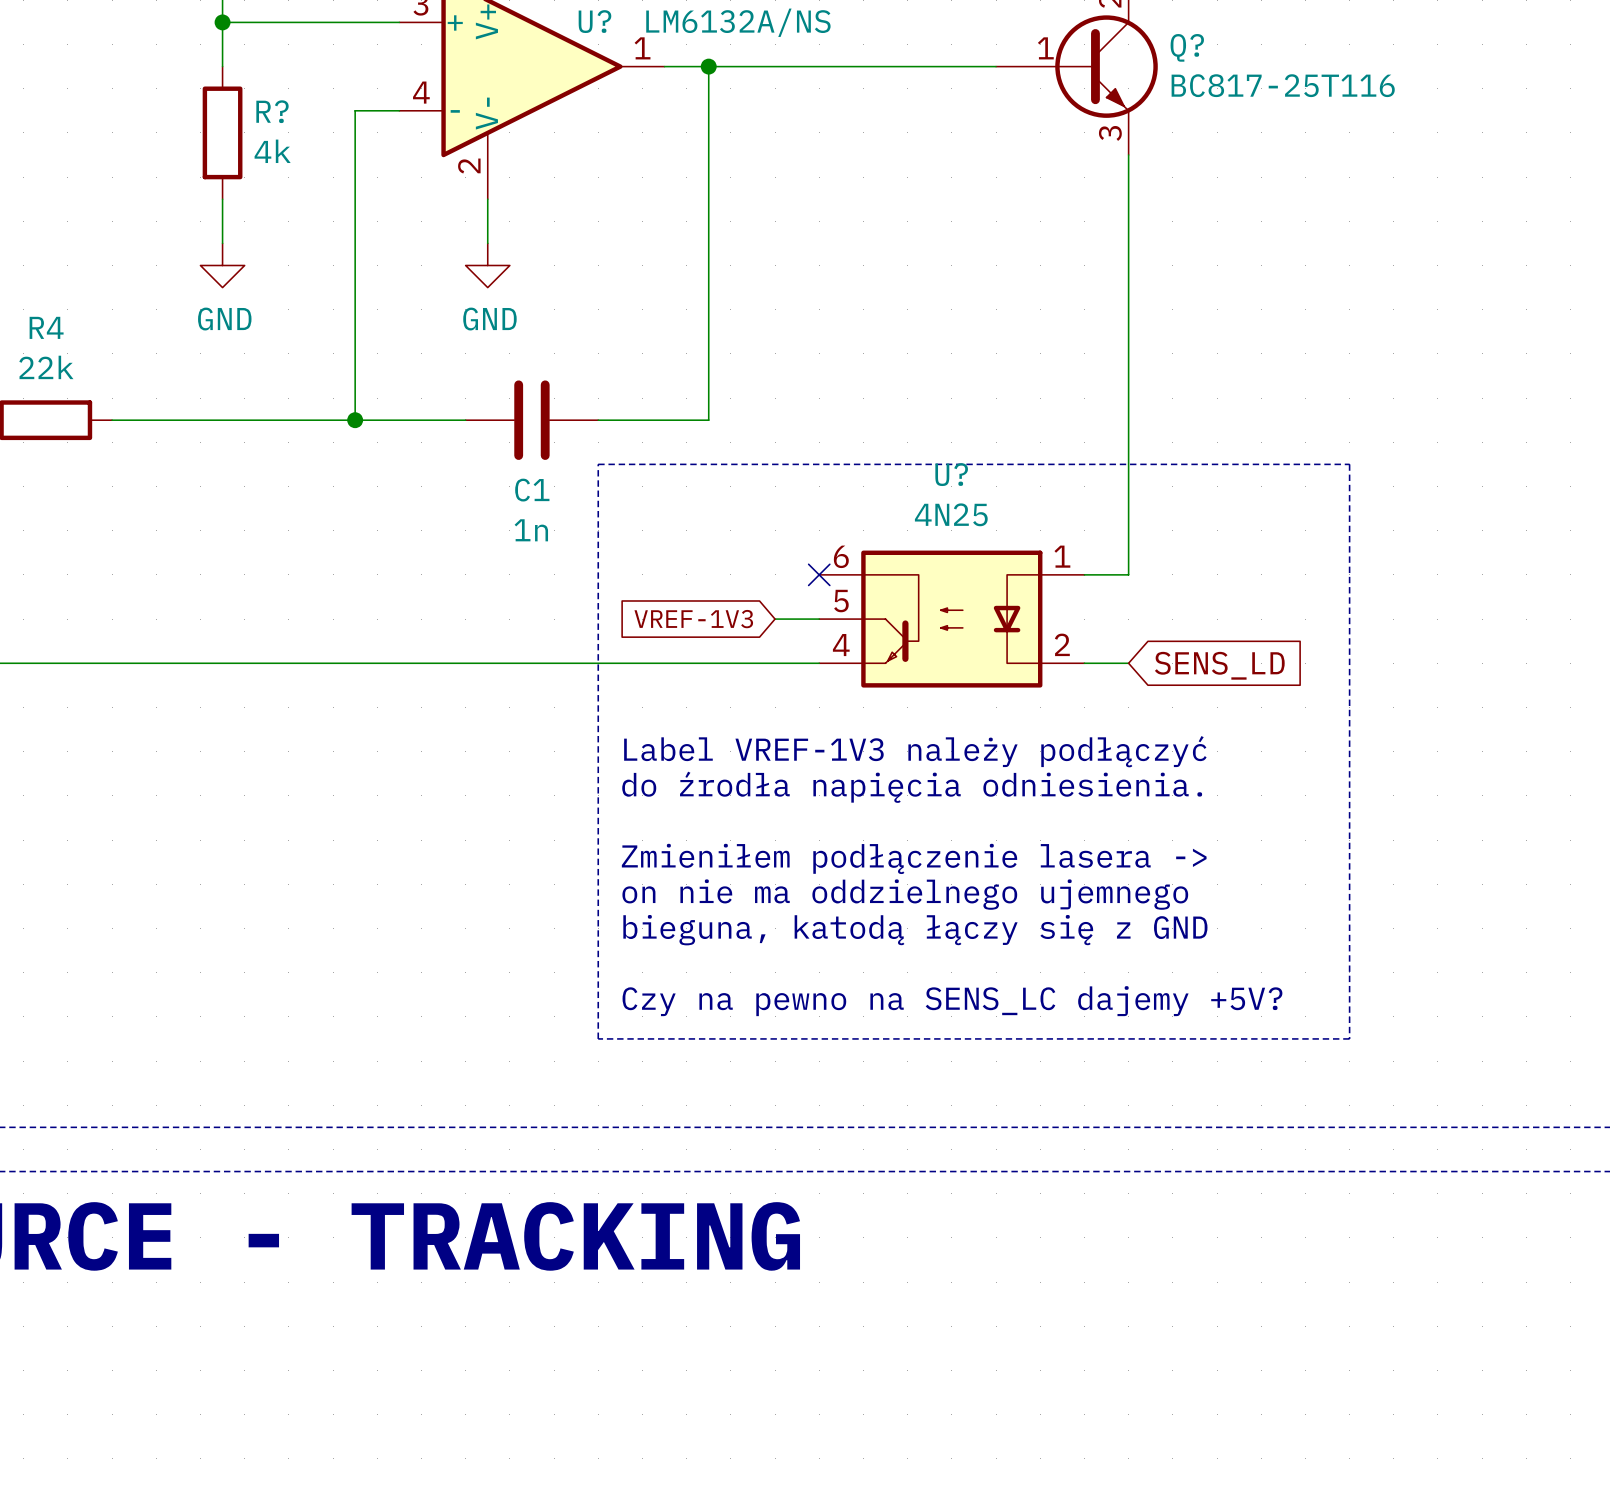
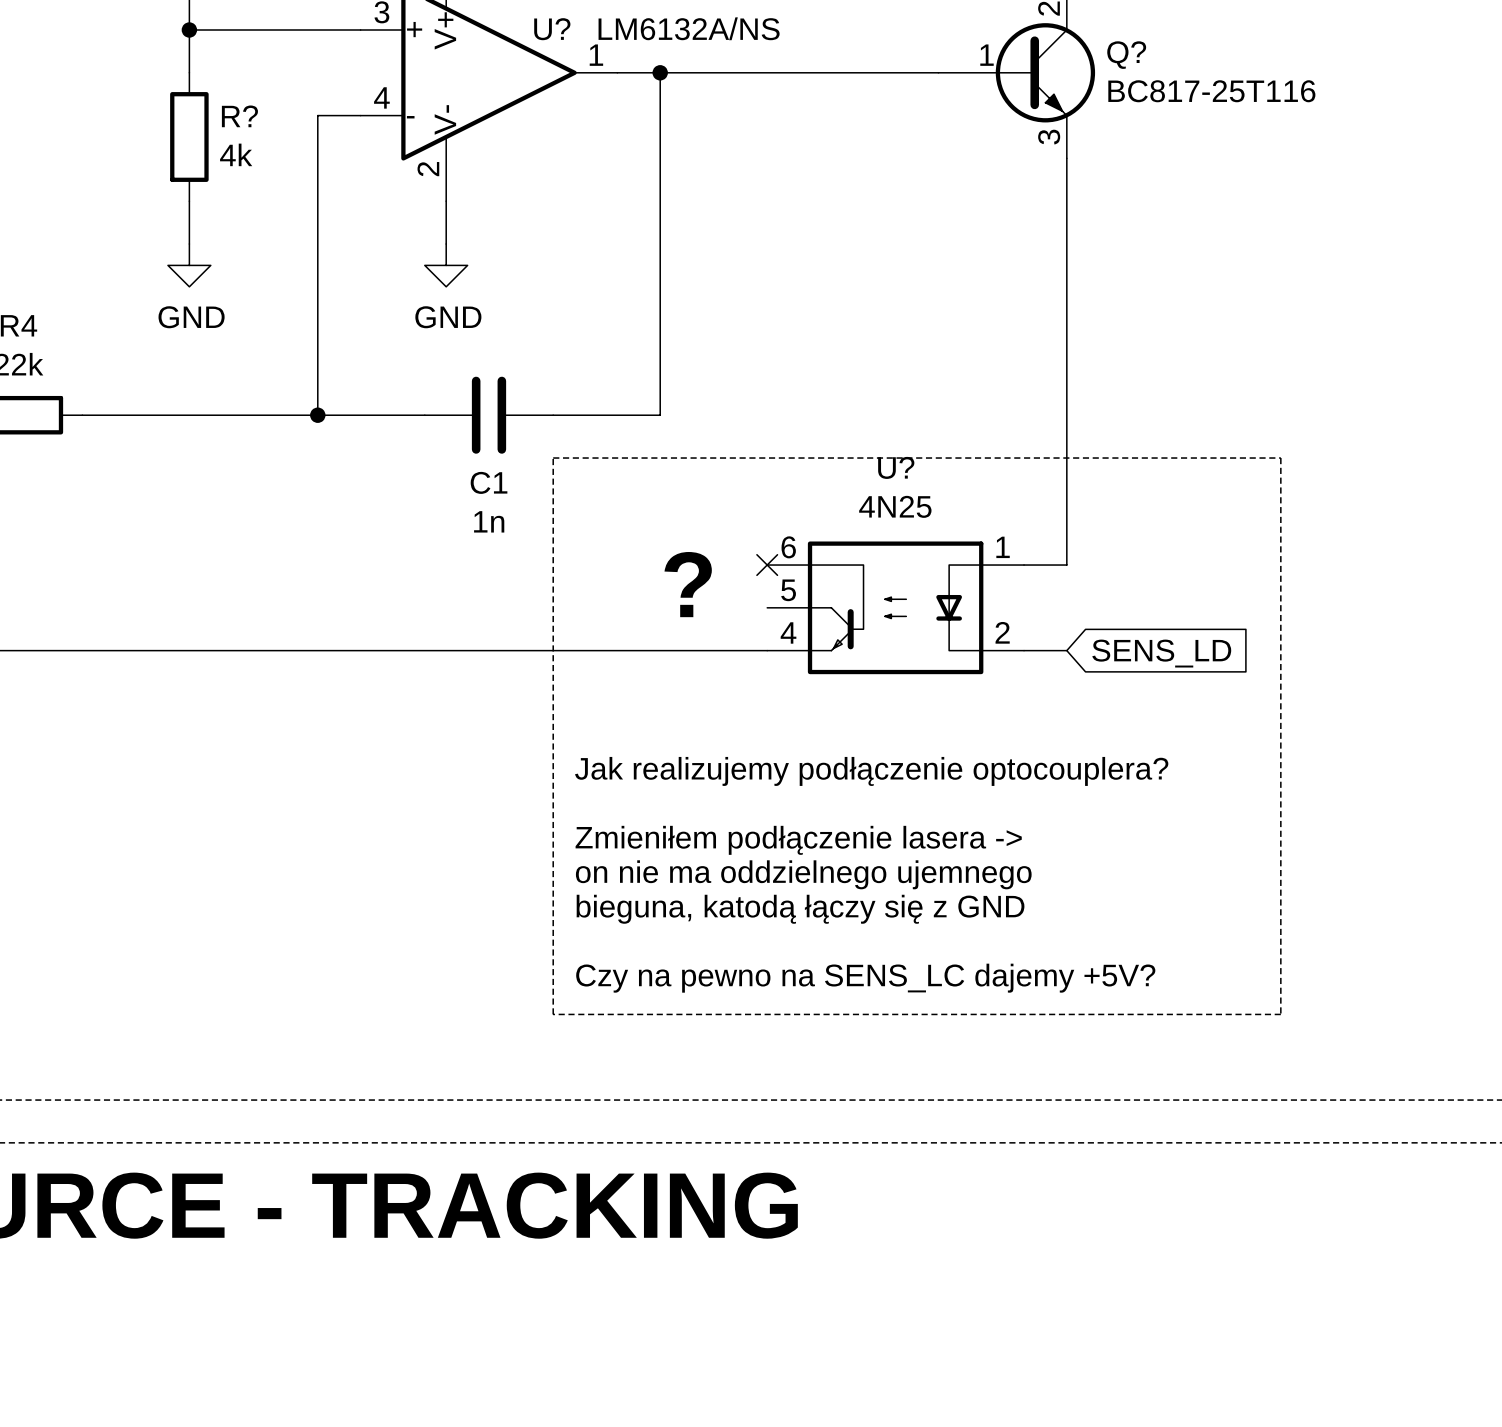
text: none -> ? (688, 584)
global label: VREF-1V3 (693, 619) -> none
wire: (775, 619) (819, 619) -> none
text: Label VREF-1V3 należy podłączyć (915, 751) -> none
text: do źrodła napięcia odniesienia. (912, 787) -> Jak realizujemy podłączenie optocouplera? (871, 771)

